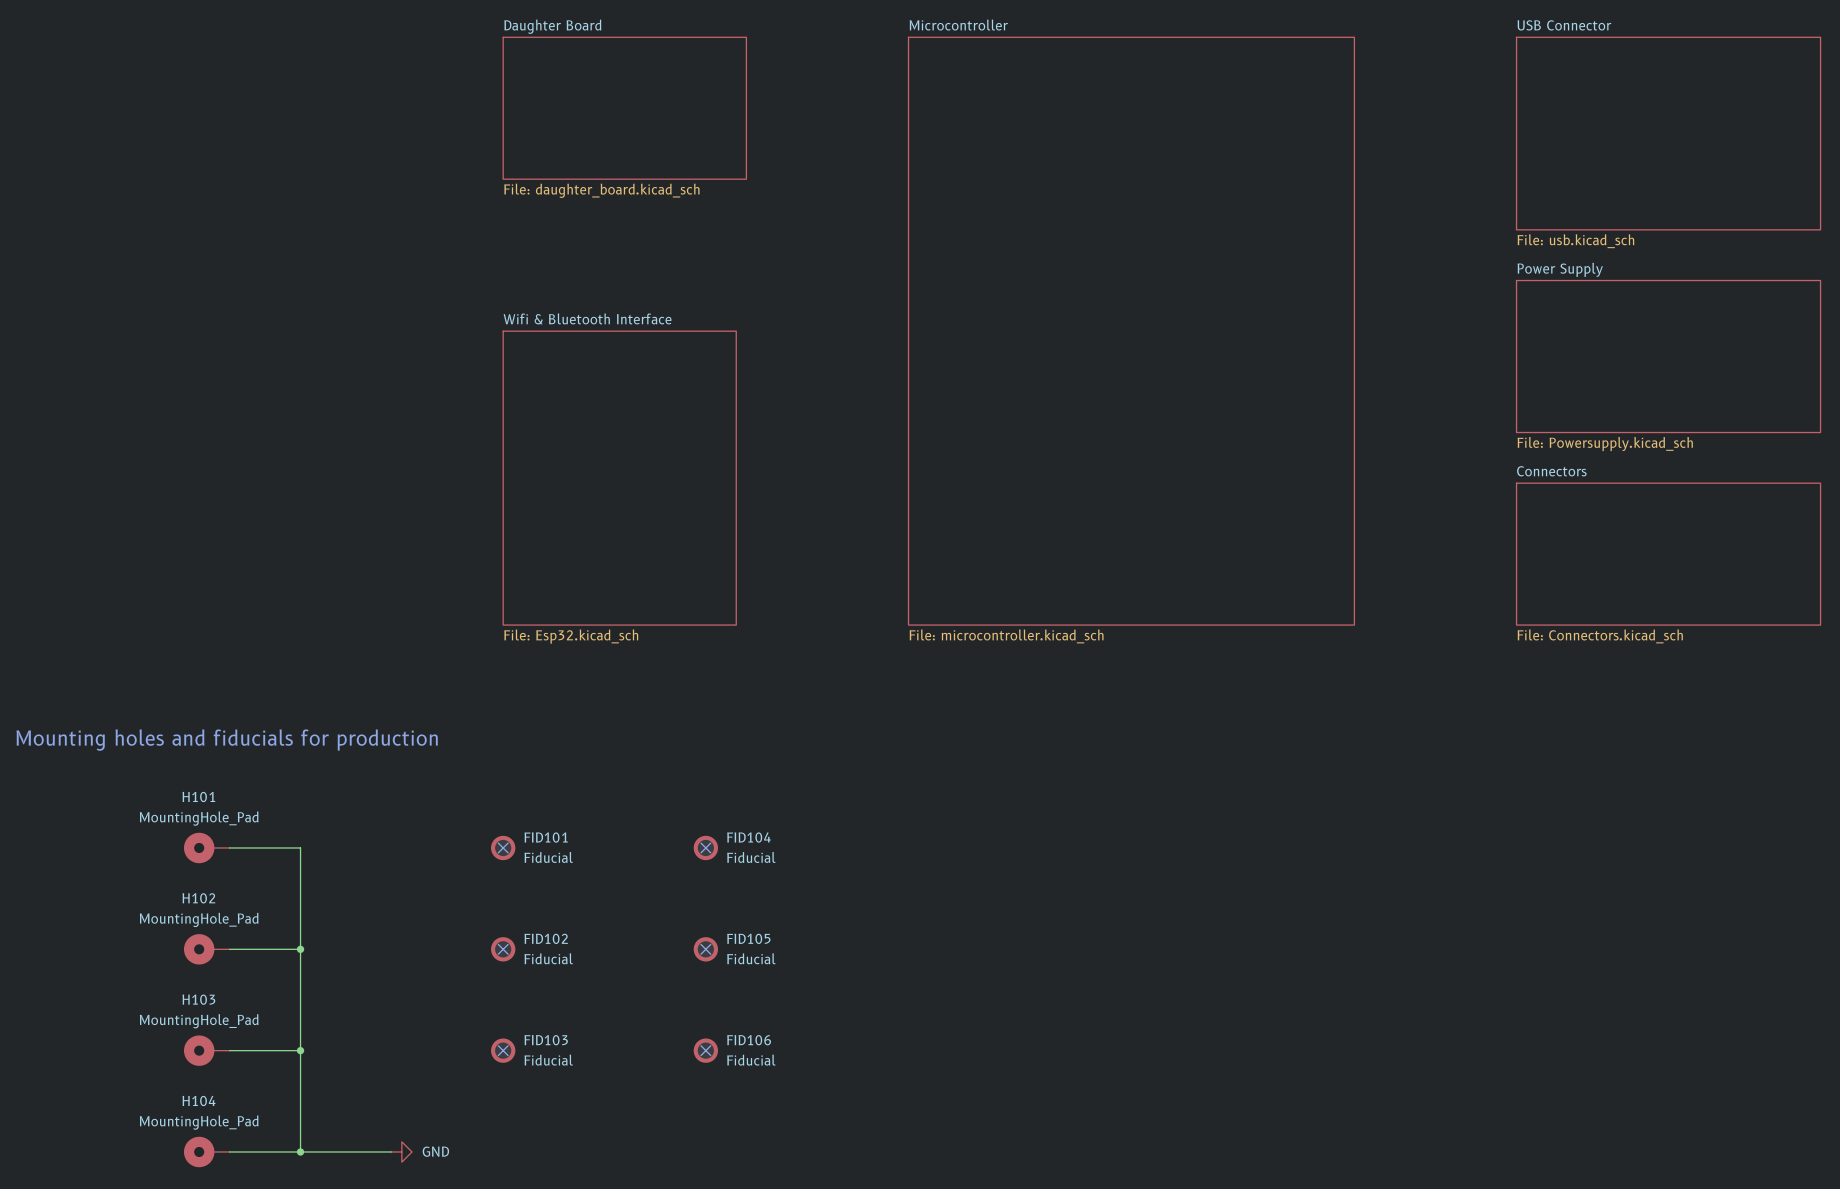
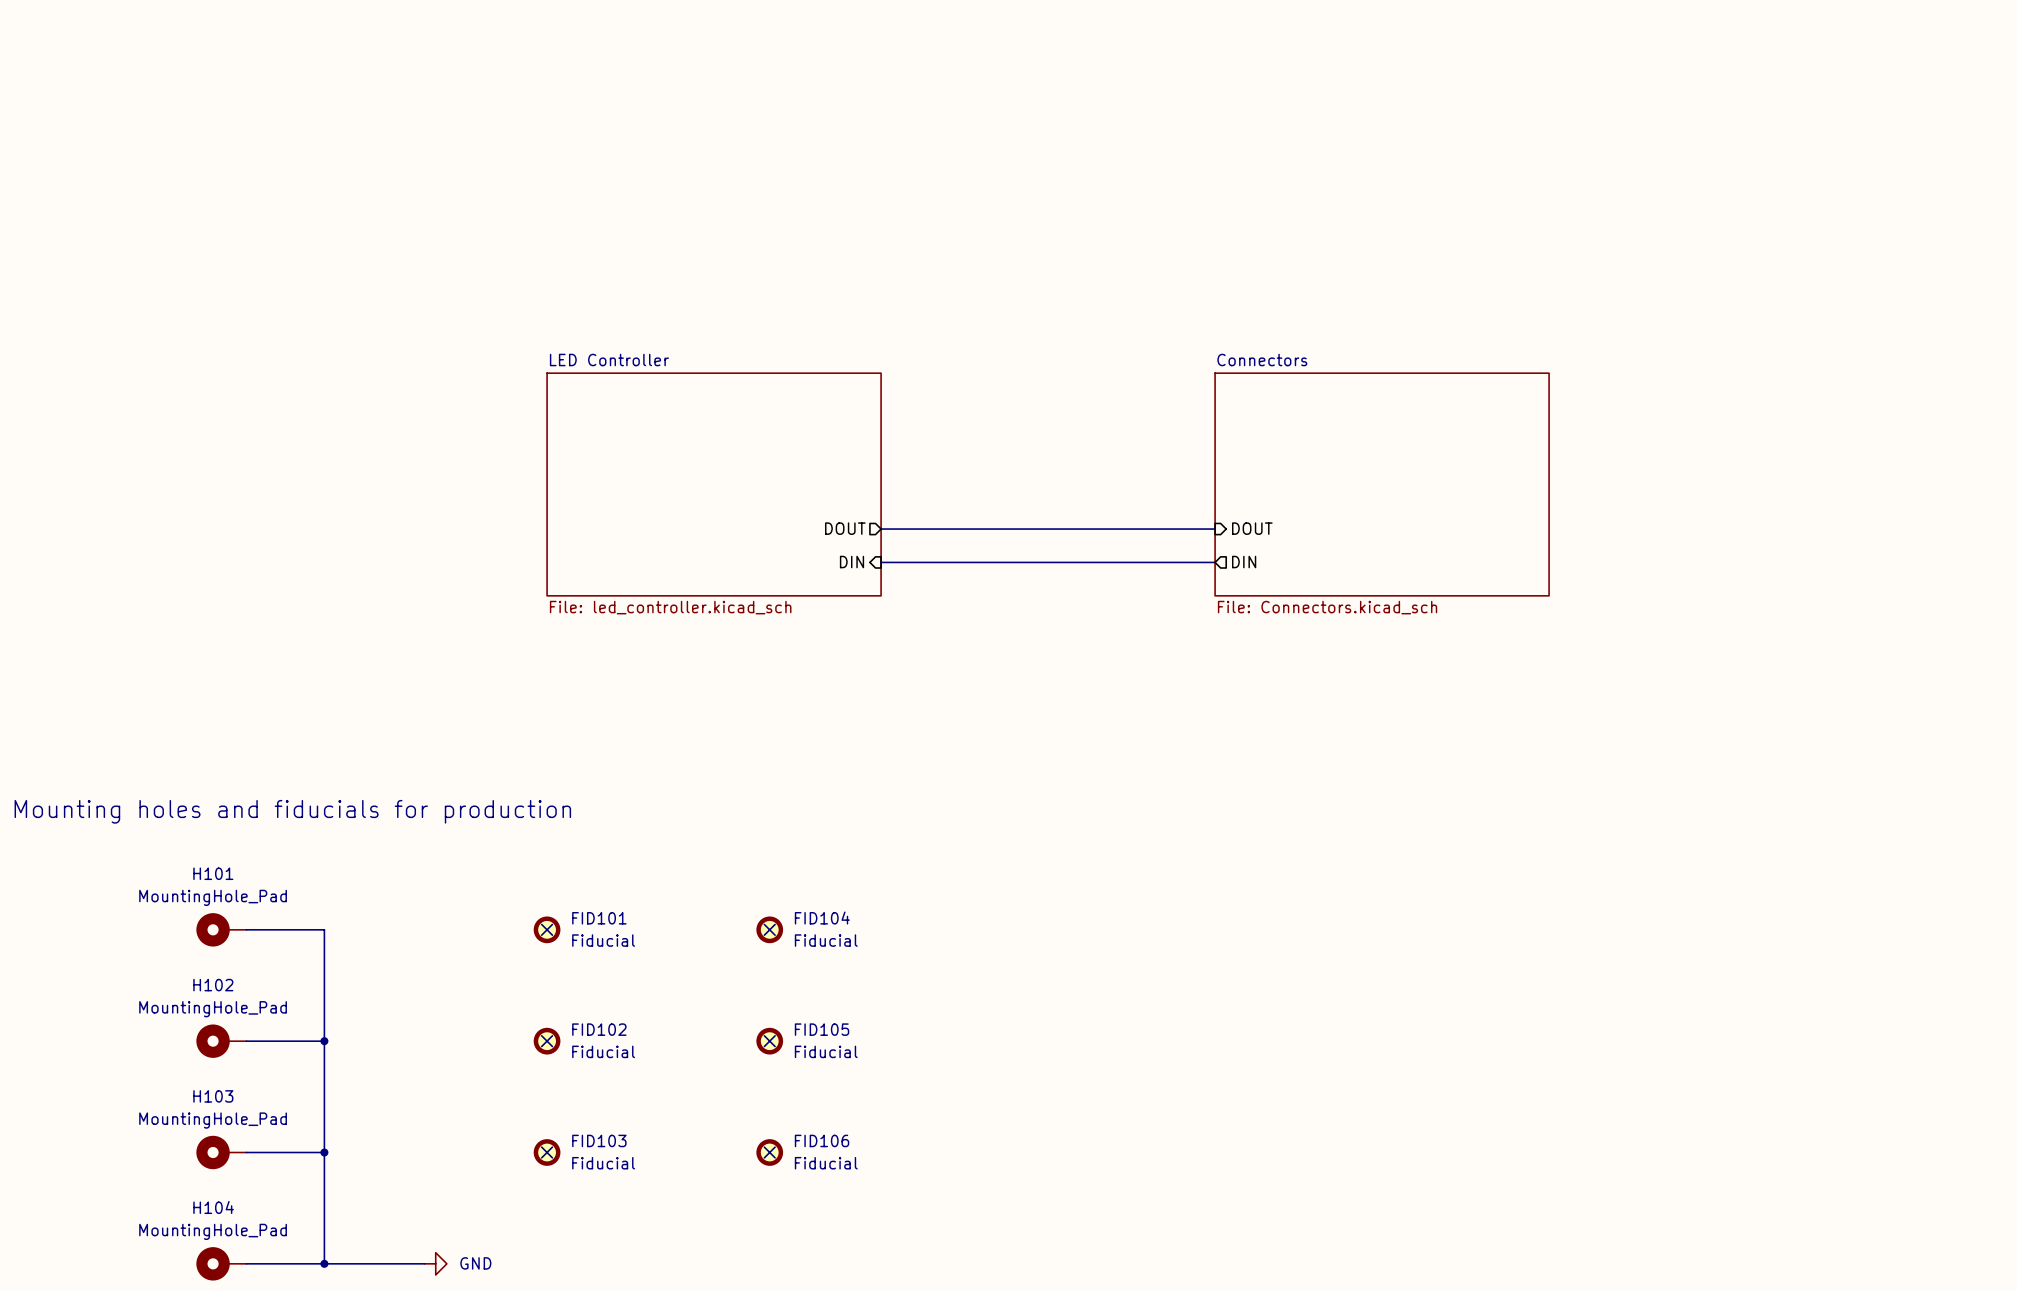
sheet Daughter Board: File: daughter_board.kicad_sch (624, 108) -> none
sheet USB Connector: File: usb.kicad_sch (1668, 133) -> none
sheet Microcontroller: File: microcontroller.kicad_sch (1131, 331) -> none
sheet Power Supply: File: Powersupply.kicad_sch (1668, 356) -> none
sheet LED Controller: none -> File: led_controller.kicad_sch (714, 484)
sheet Connectors: none -> File: Connectors.kicad_sch (1382, 484)
sheet Wifi & Bluetooth Interface: File: Esp32.kicad_sch (619, 478) -> none
sheet pin: none -> DOUT (845, 528)
sheet pin: none -> DOUT (1252, 528)
wire: none -> (881, 529) (1215, 529)
sheet pin: none -> DIN (852, 562)
wire: none -> (881, 562) (1215, 562)
sheet pin: none -> DIN (1244, 562)
sheet Connectors: File: Connectors.kicad_sch (1668, 554) -> none

